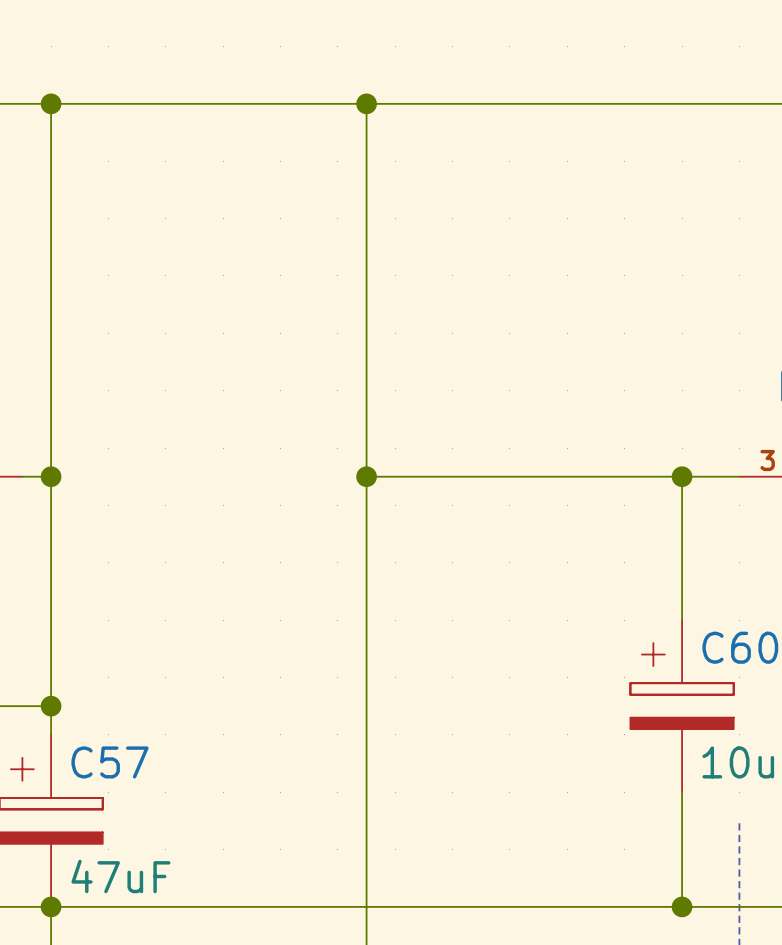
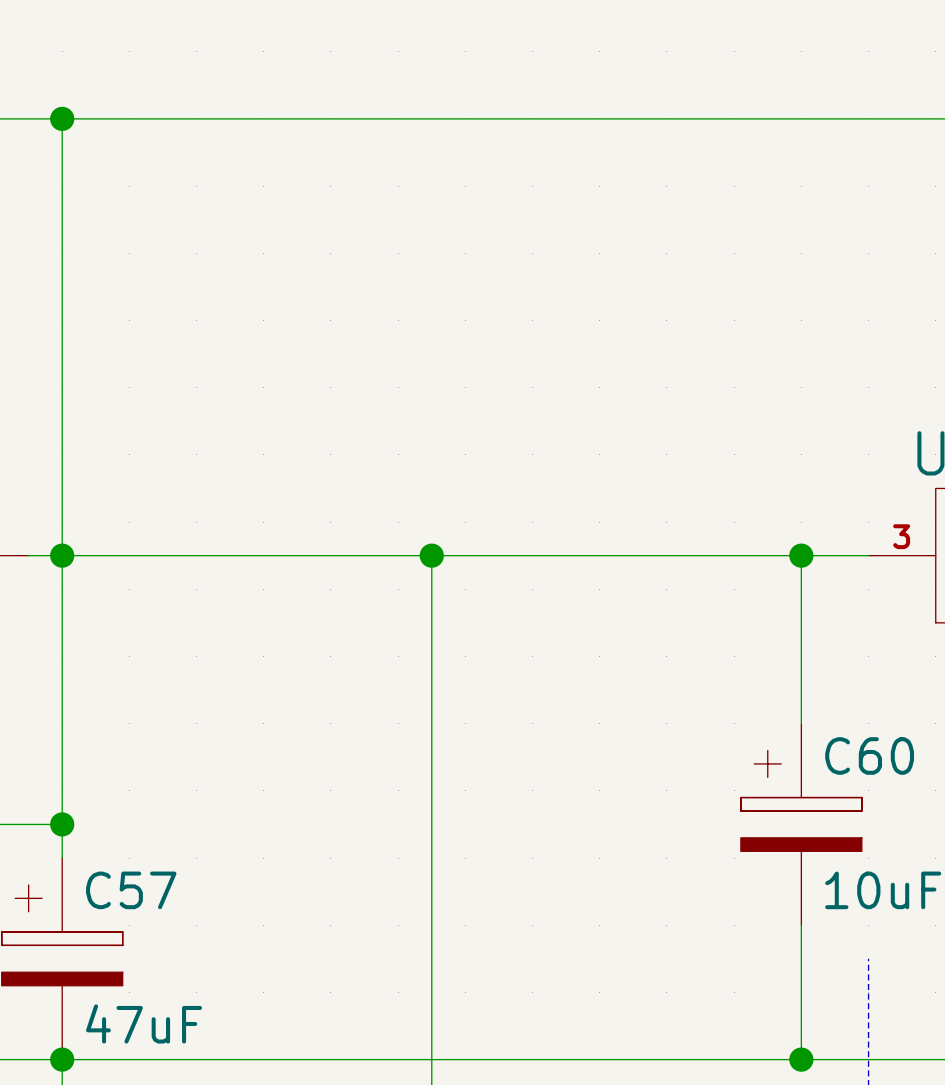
wire: (366, 103) (366, 476) -> (62, 555) (431, 555)
junction: (366, 103) -> none

